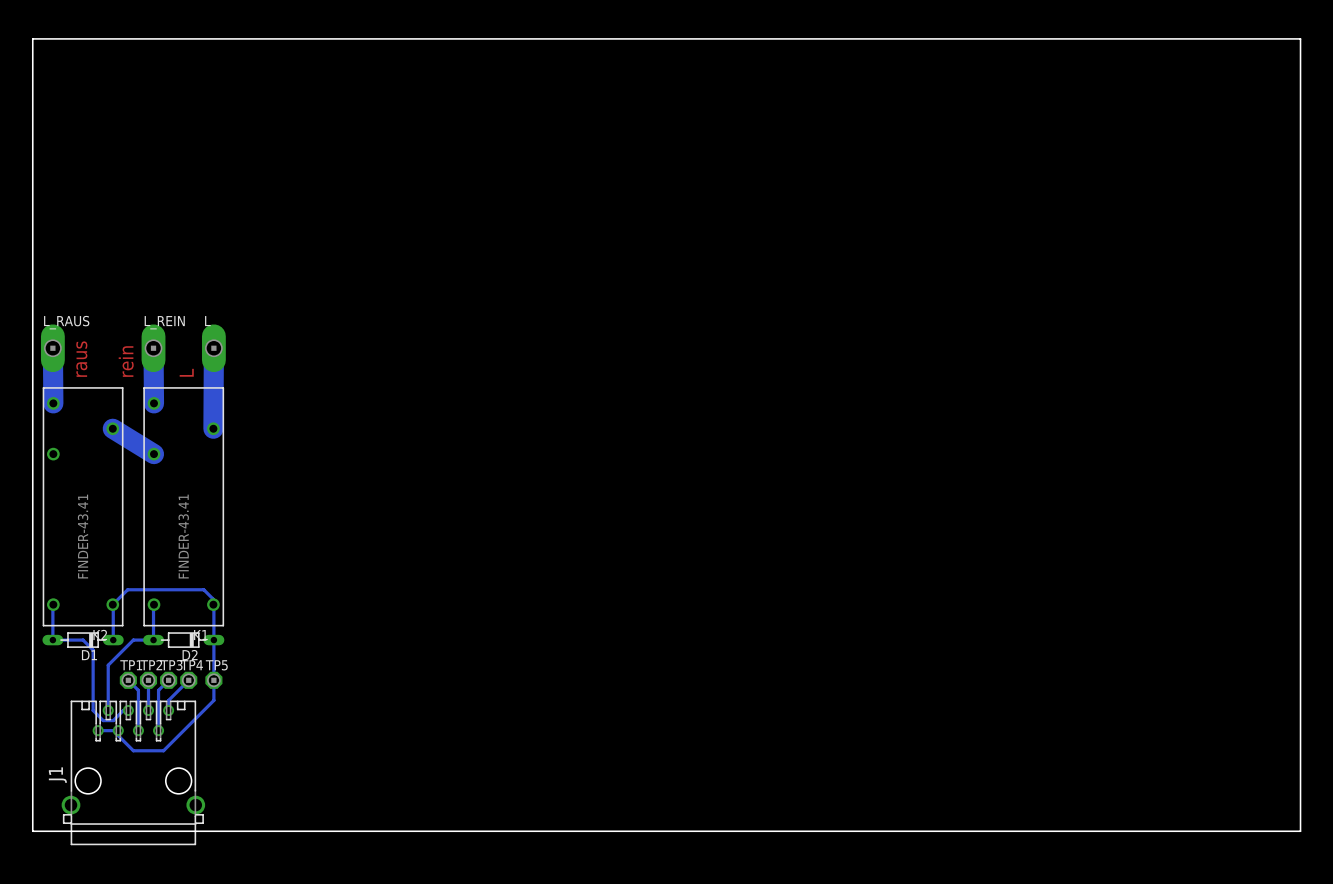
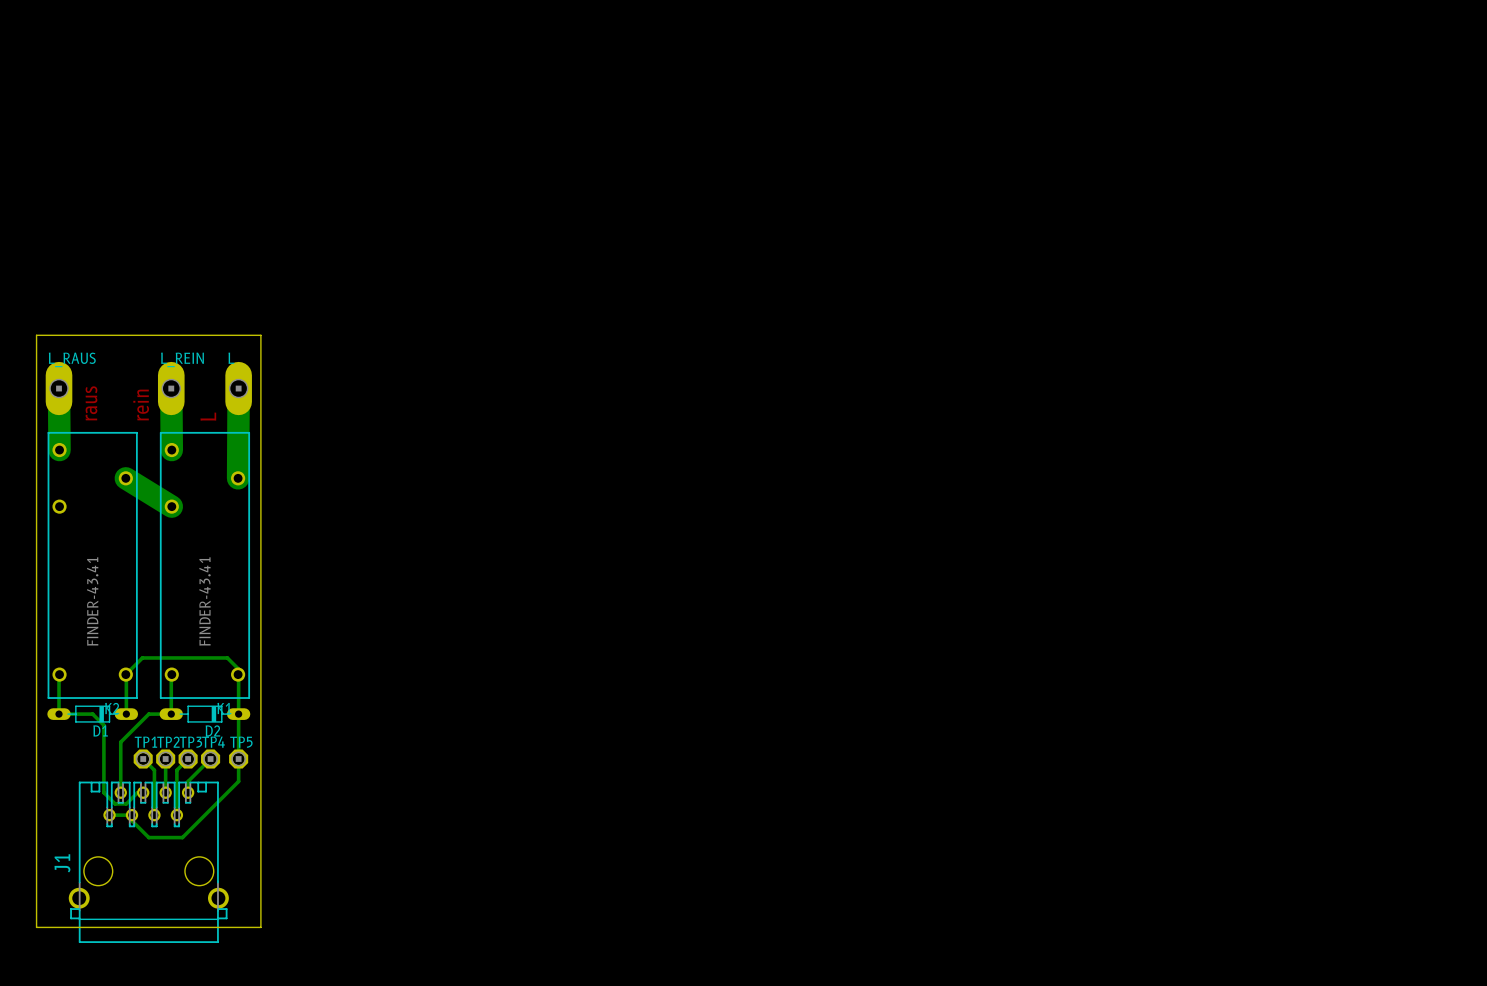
board edge: (32, 300) (32, 38) (1300, 38) (1300, 831) (233, 831) -> (36, 335) (260, 335) (260, 927)

